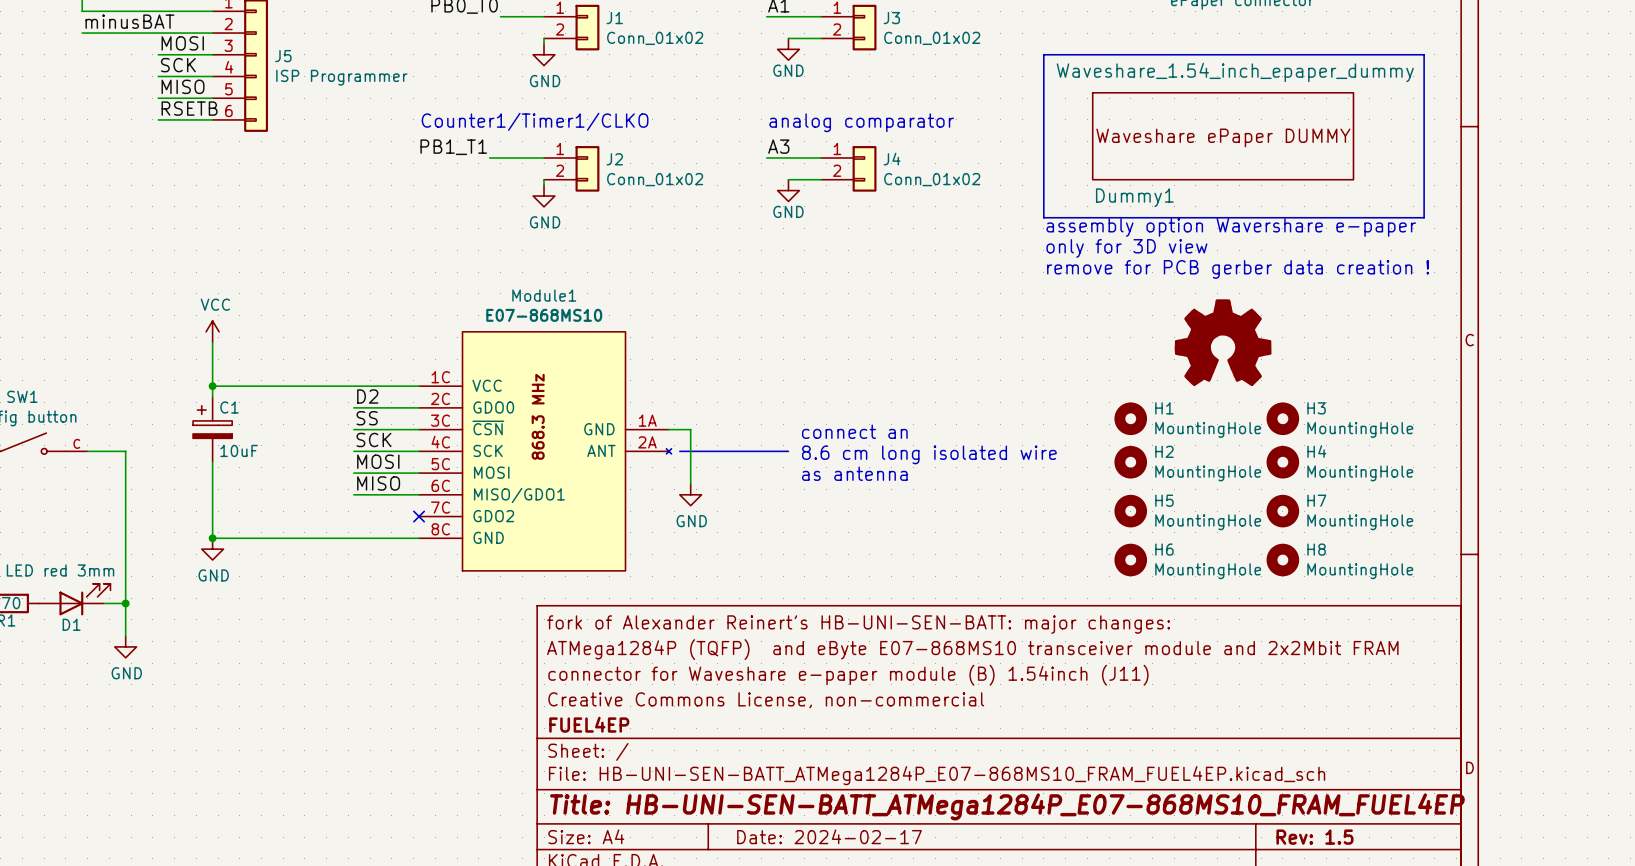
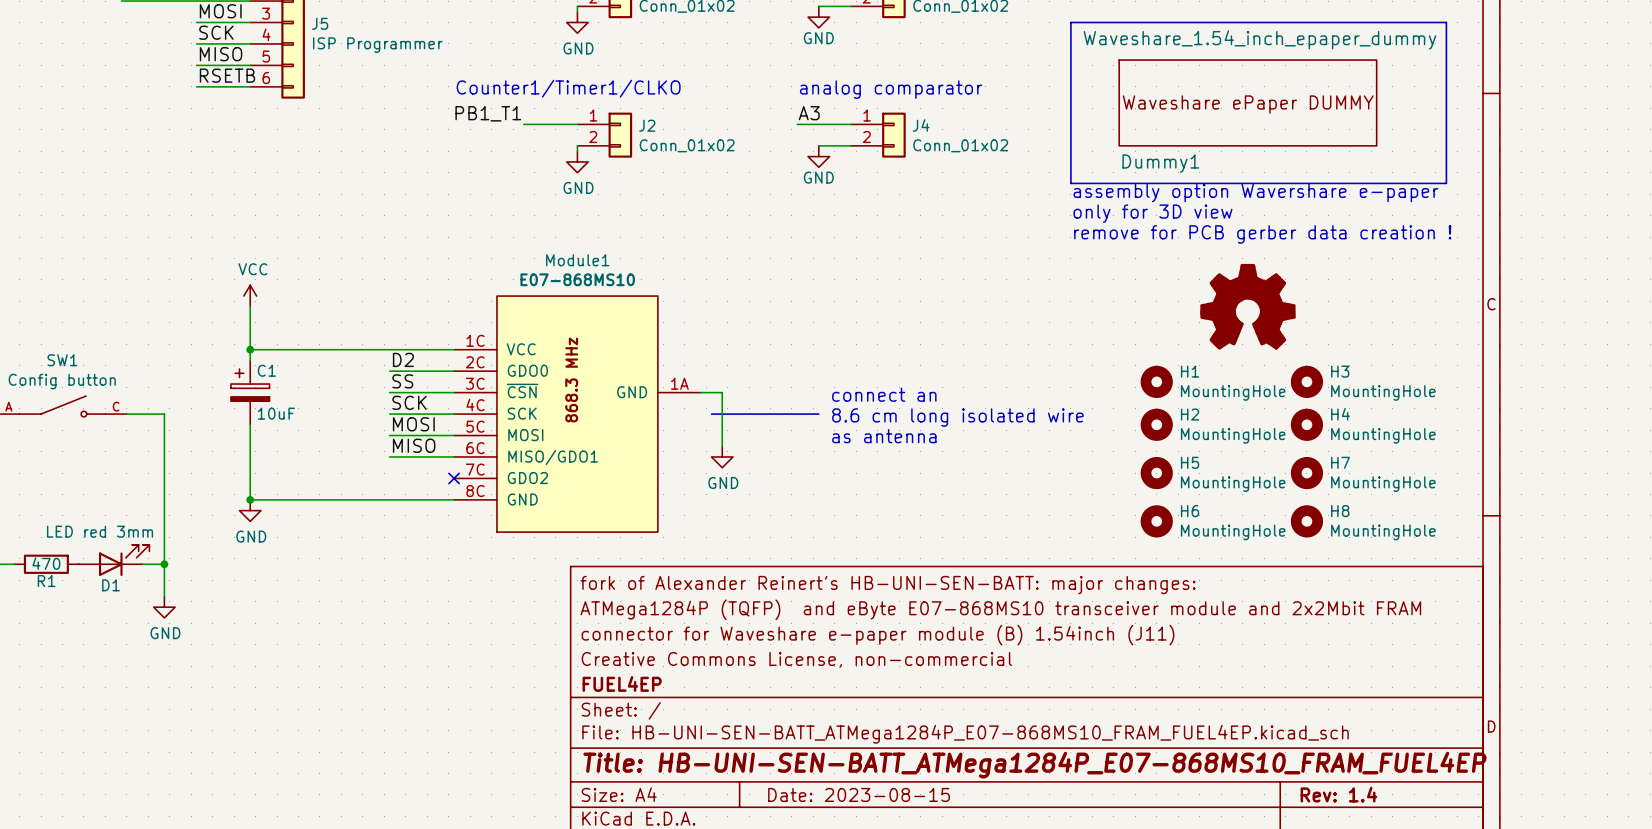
Module1 symbol: [419, 331, 672, 571] -> [454, 296, 701, 533]
title block: Date: 2024-02-17 (829, 836) -> Date: 2023-08-15 (859, 794)
title block: Rev: 1.5 (1314, 837) -> Rev: 1.4 (1338, 794)

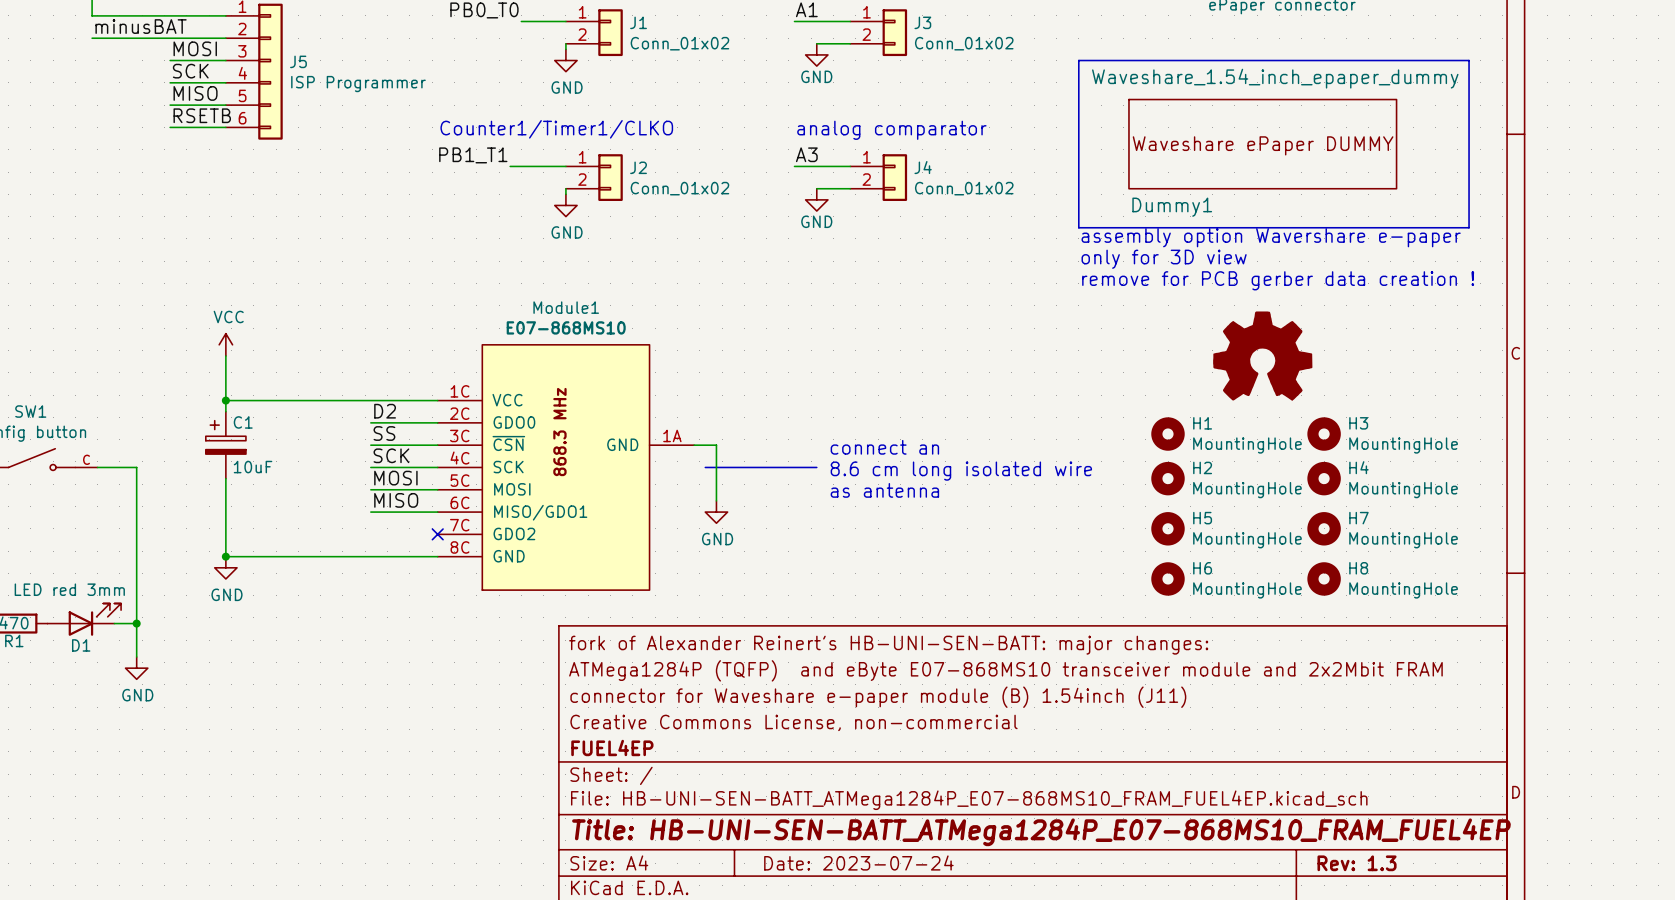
title block: Date: 2023-08-15 (859, 794) -> Date: 2023-07-24 (858, 862)
title block: Rev: 1.4 (1338, 794) -> Rev: 1.3 (1357, 863)

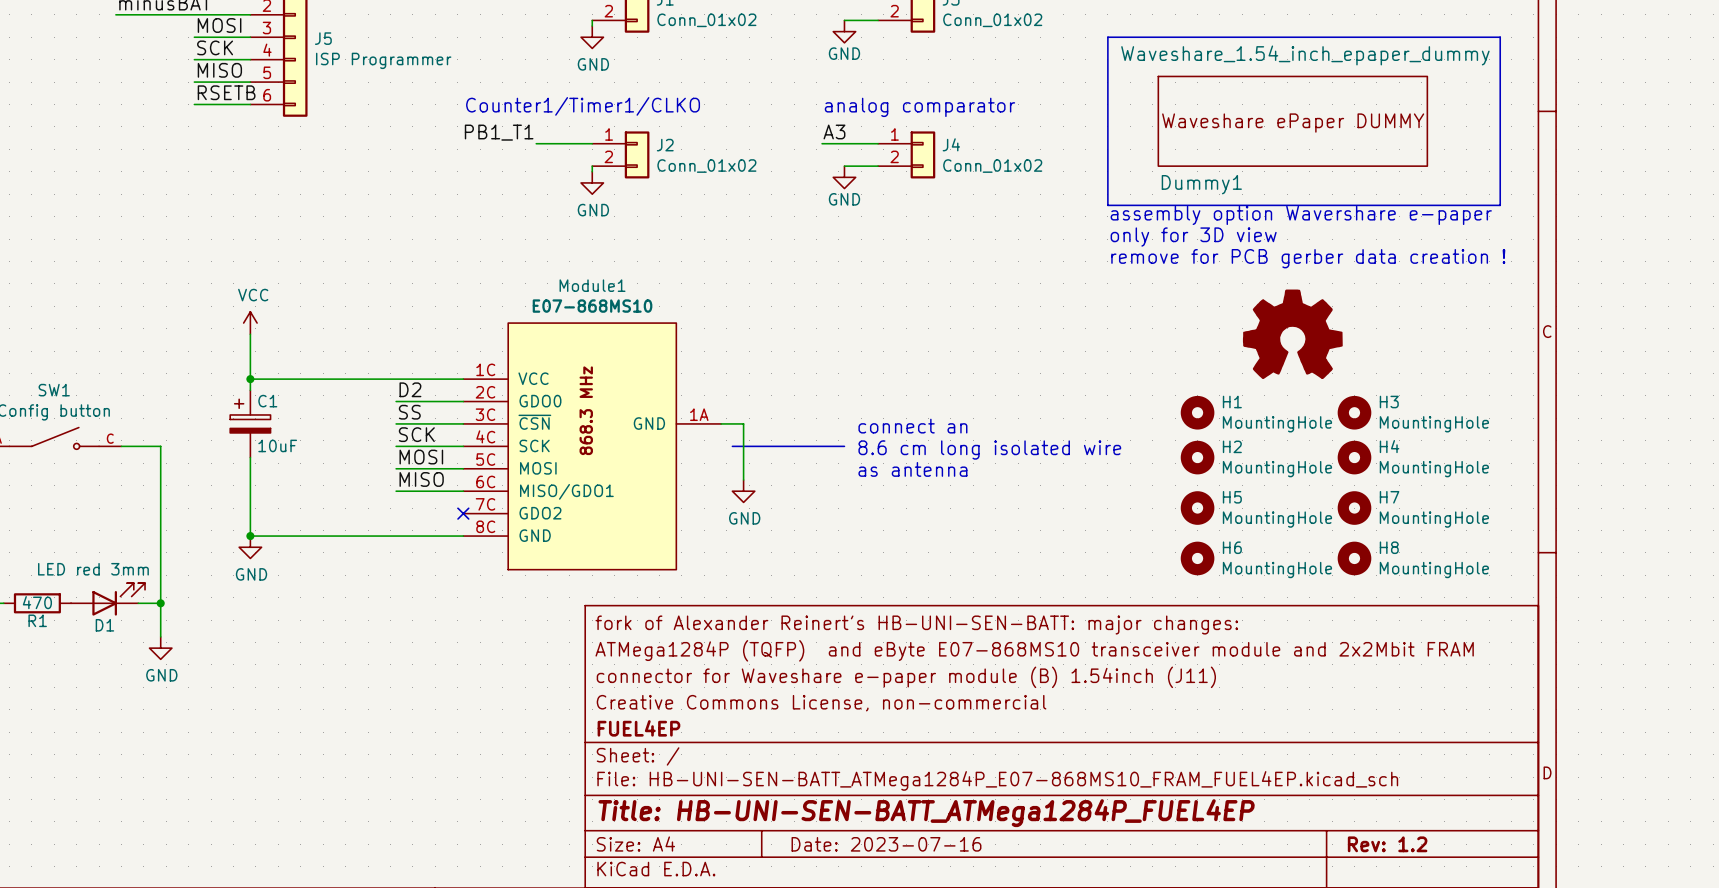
title block: Title: HB-UNI-SEN-BATT_ATMega1284P_E07-868MS10_FRAM_FUEL4EP (1041, 832) -> Title: HB-UNI-SEN-BATT_ATMega1284P_FUEL4EP (926, 813)
title block: Date: 2023-07-24 (858, 862) -> Date: 2023-07-16 (886, 844)
title block: Rev: 1.3 (1357, 863) -> Rev: 1.2 (1387, 844)

